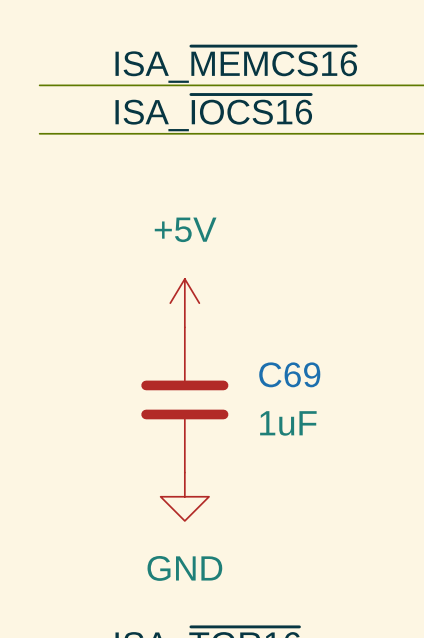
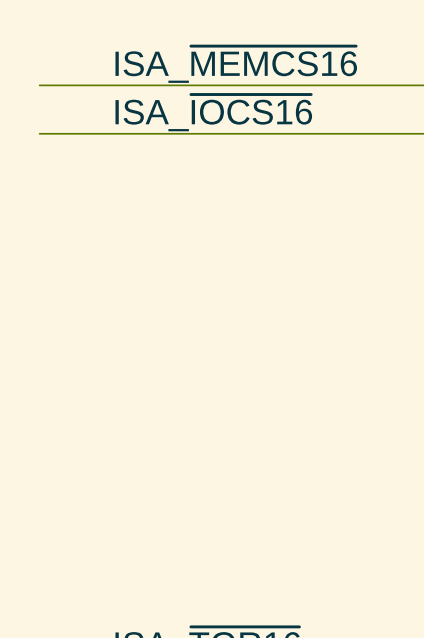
power symbol: +5V (184, 303) -> none
C69: 1uF (184, 399) -> none
power symbol: GND (184, 496) -> none

